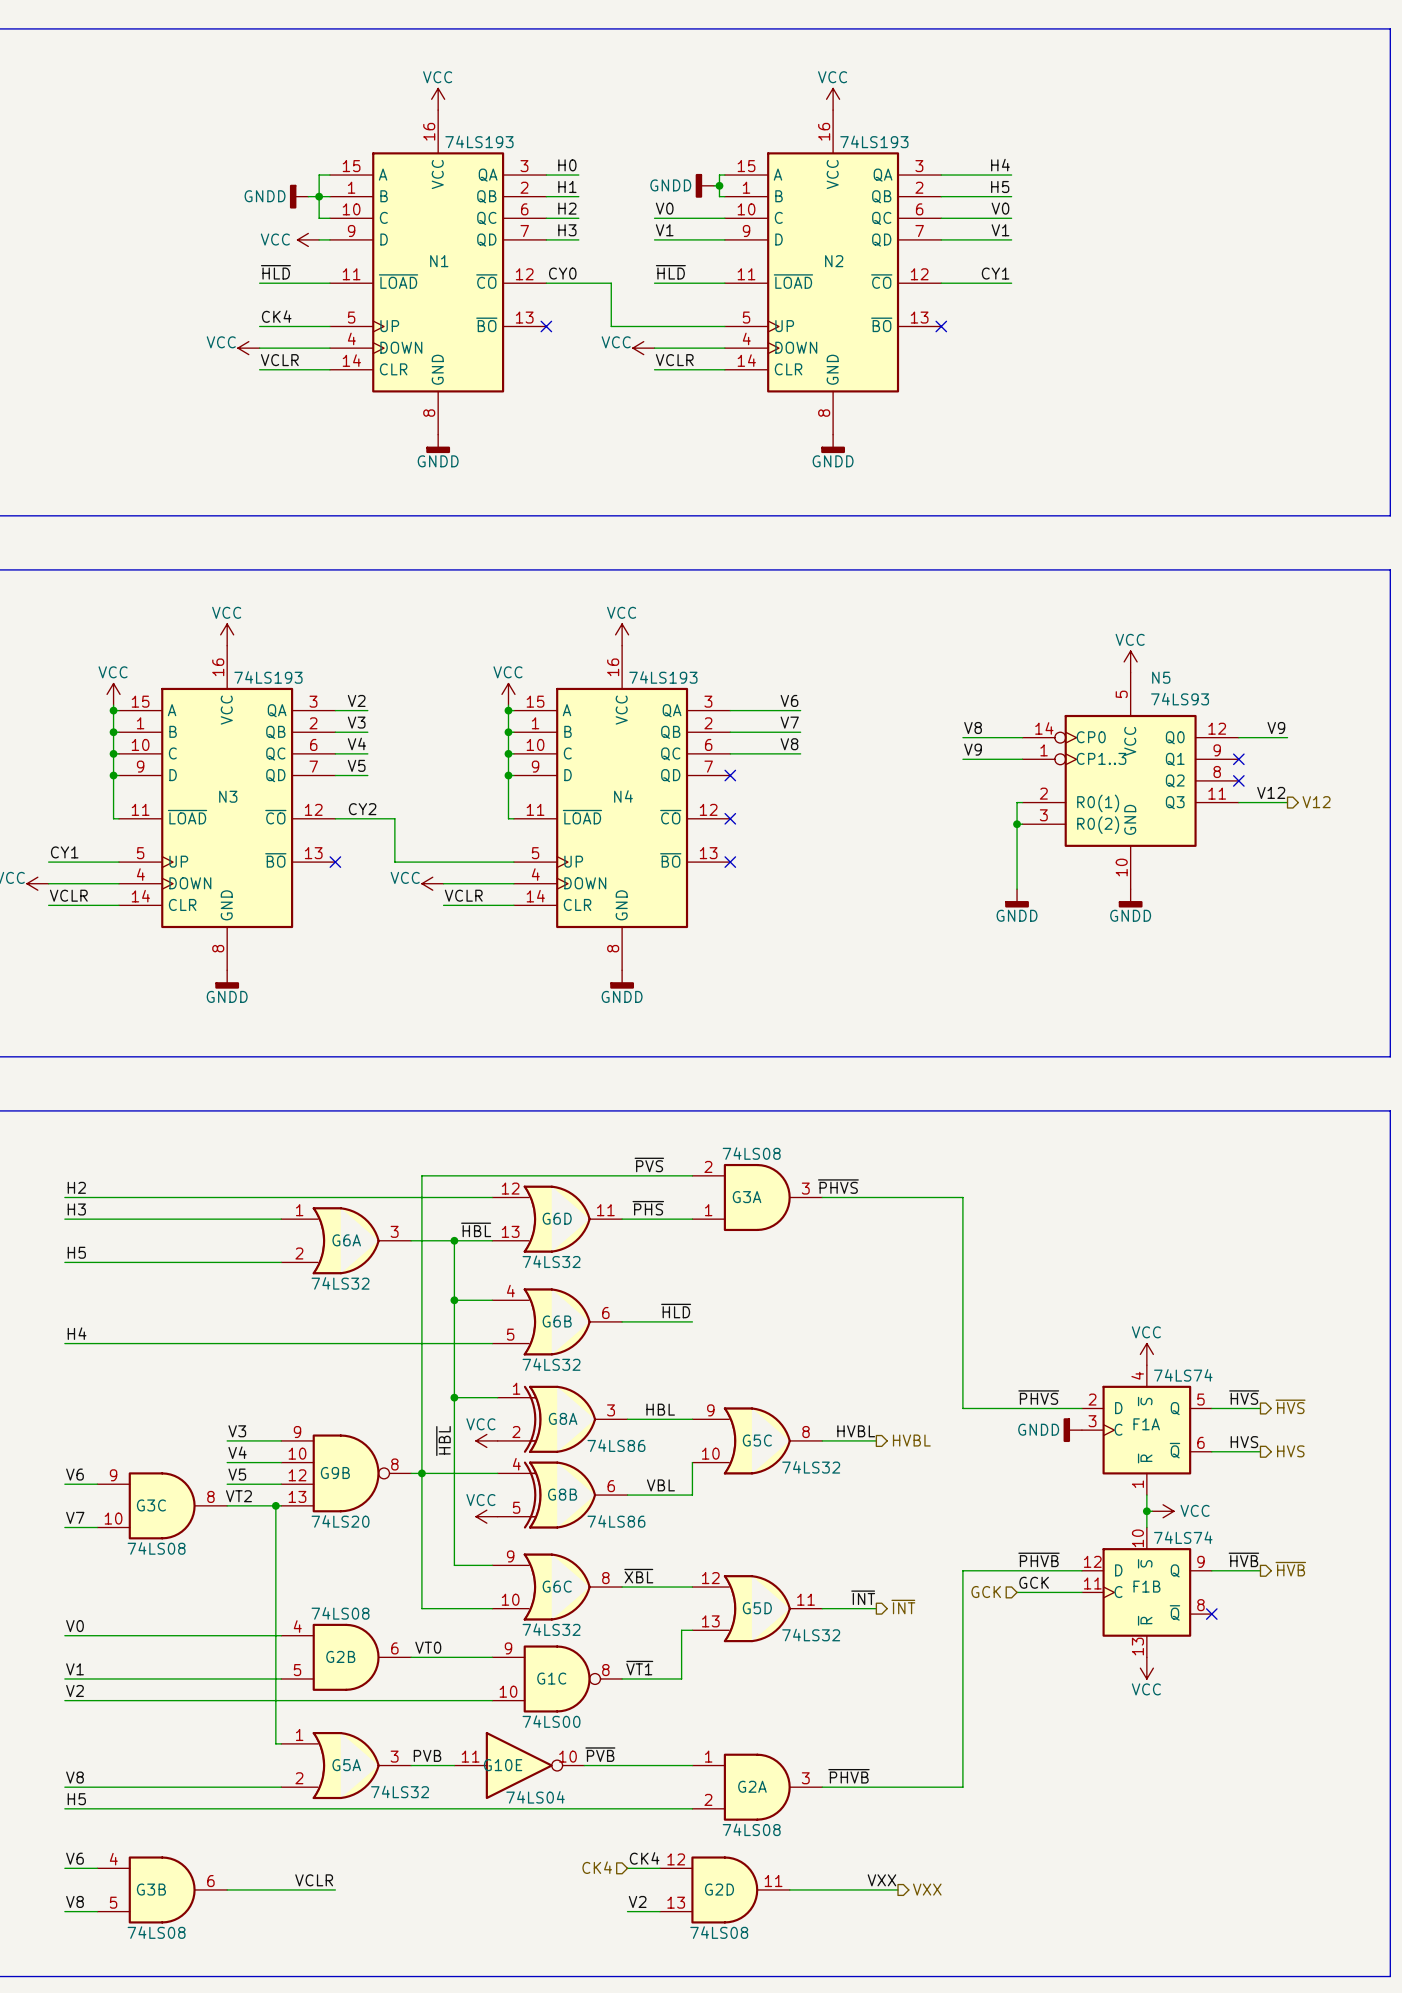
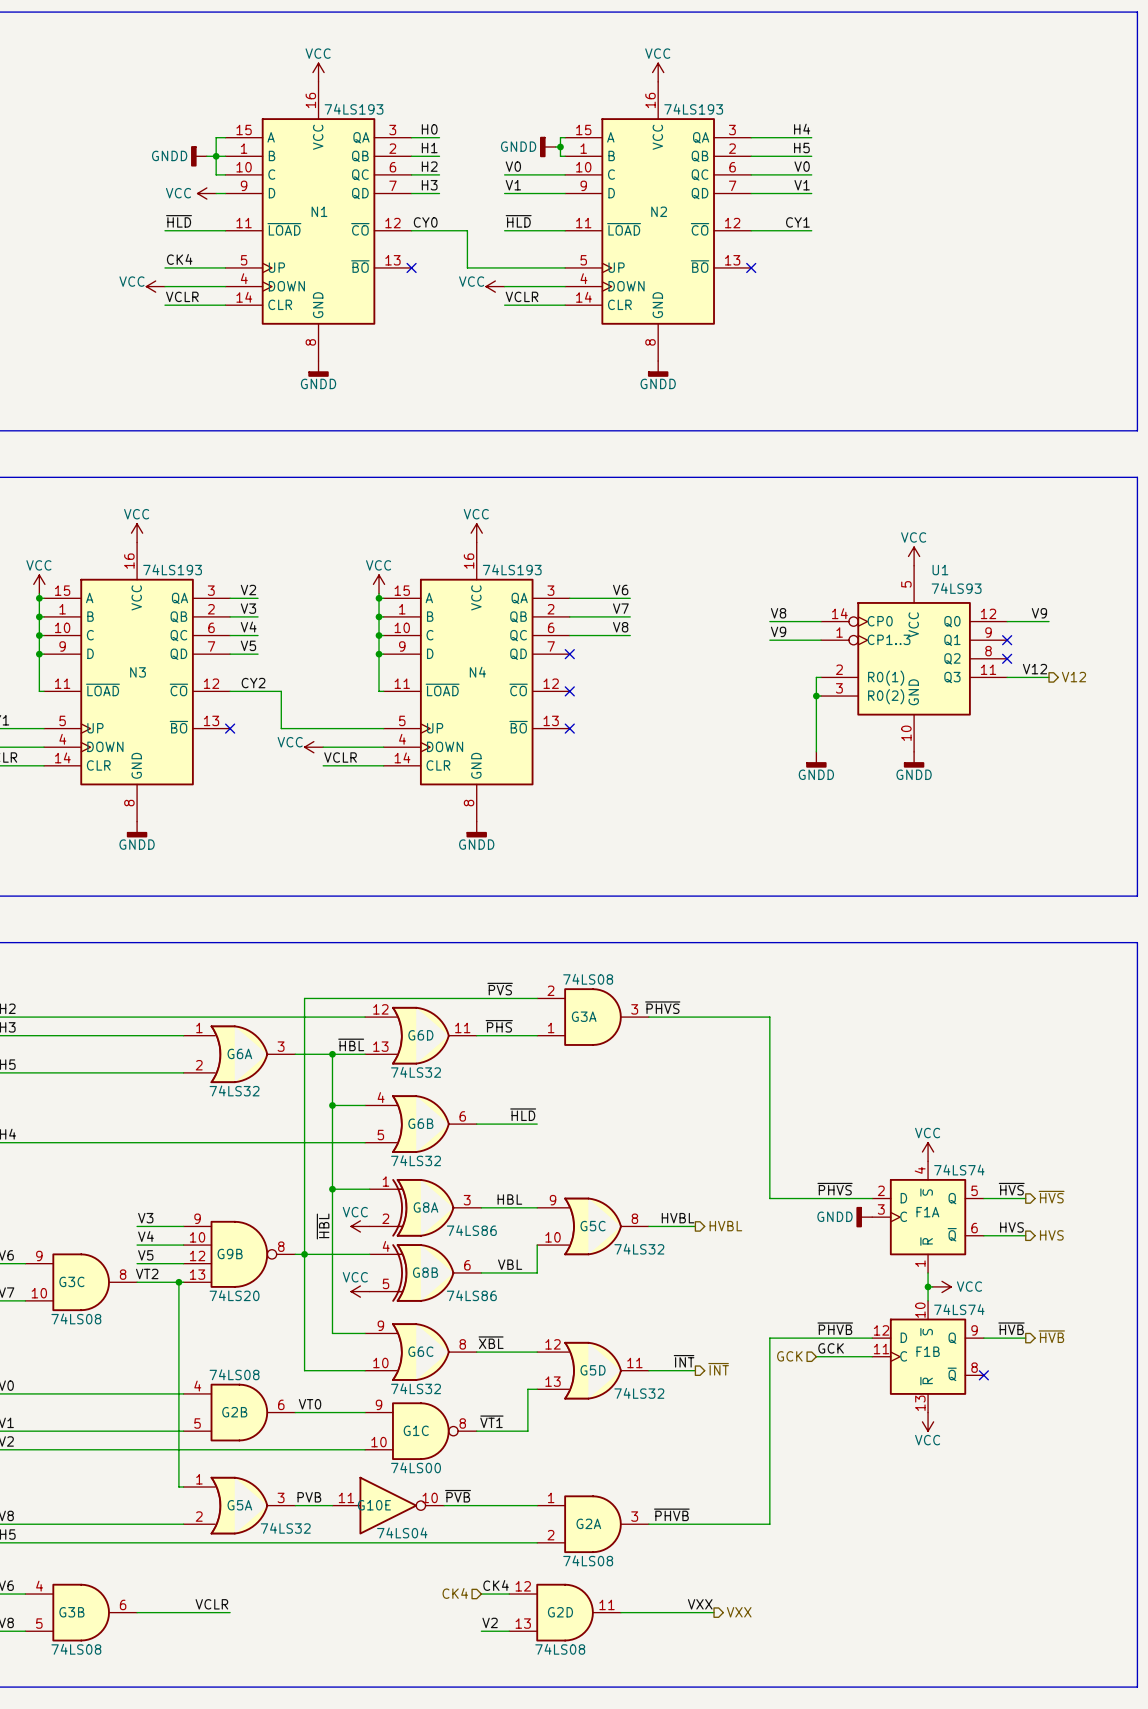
N5 name: N5 (1161, 677) -> U1 (940, 570)

